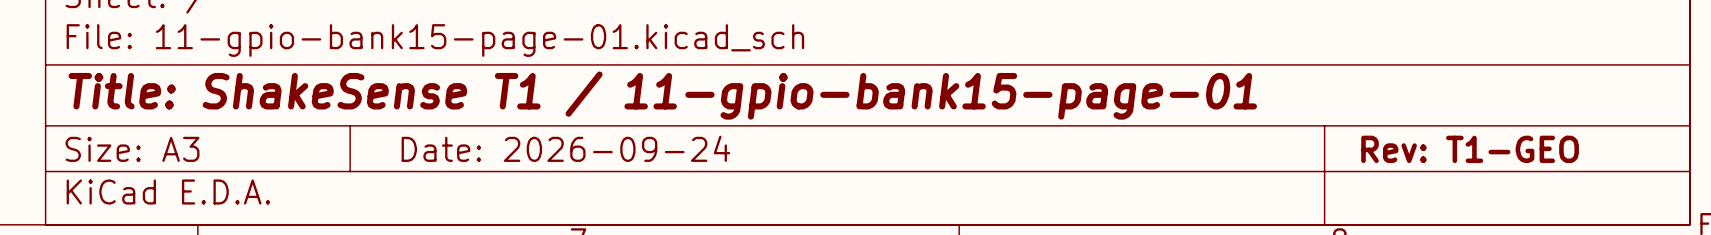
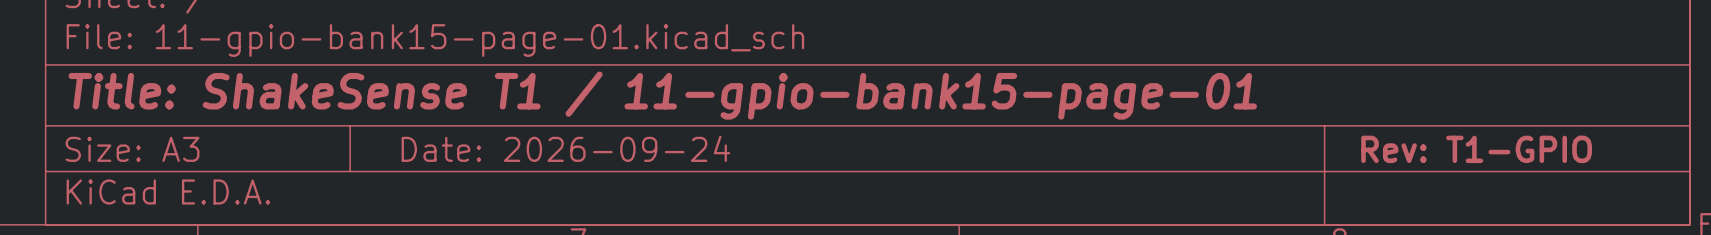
title block: Rev: T1-GEO (1470, 149) -> Rev: T1-GPIO (1476, 149)

